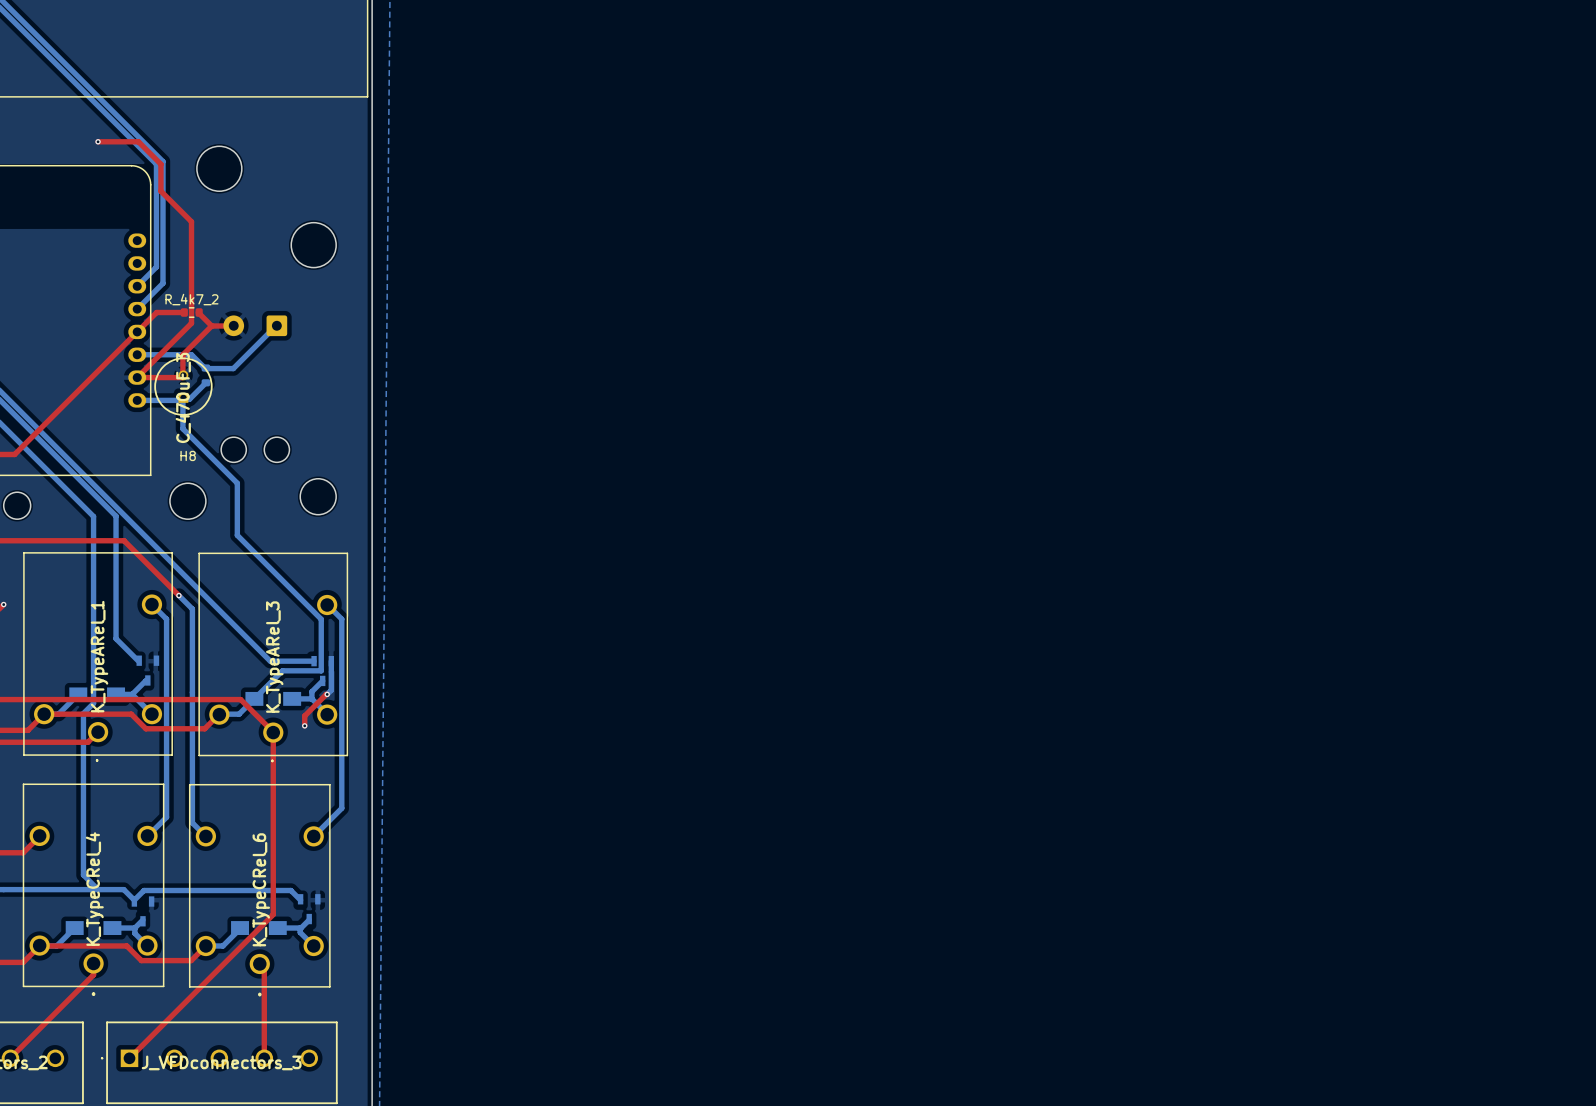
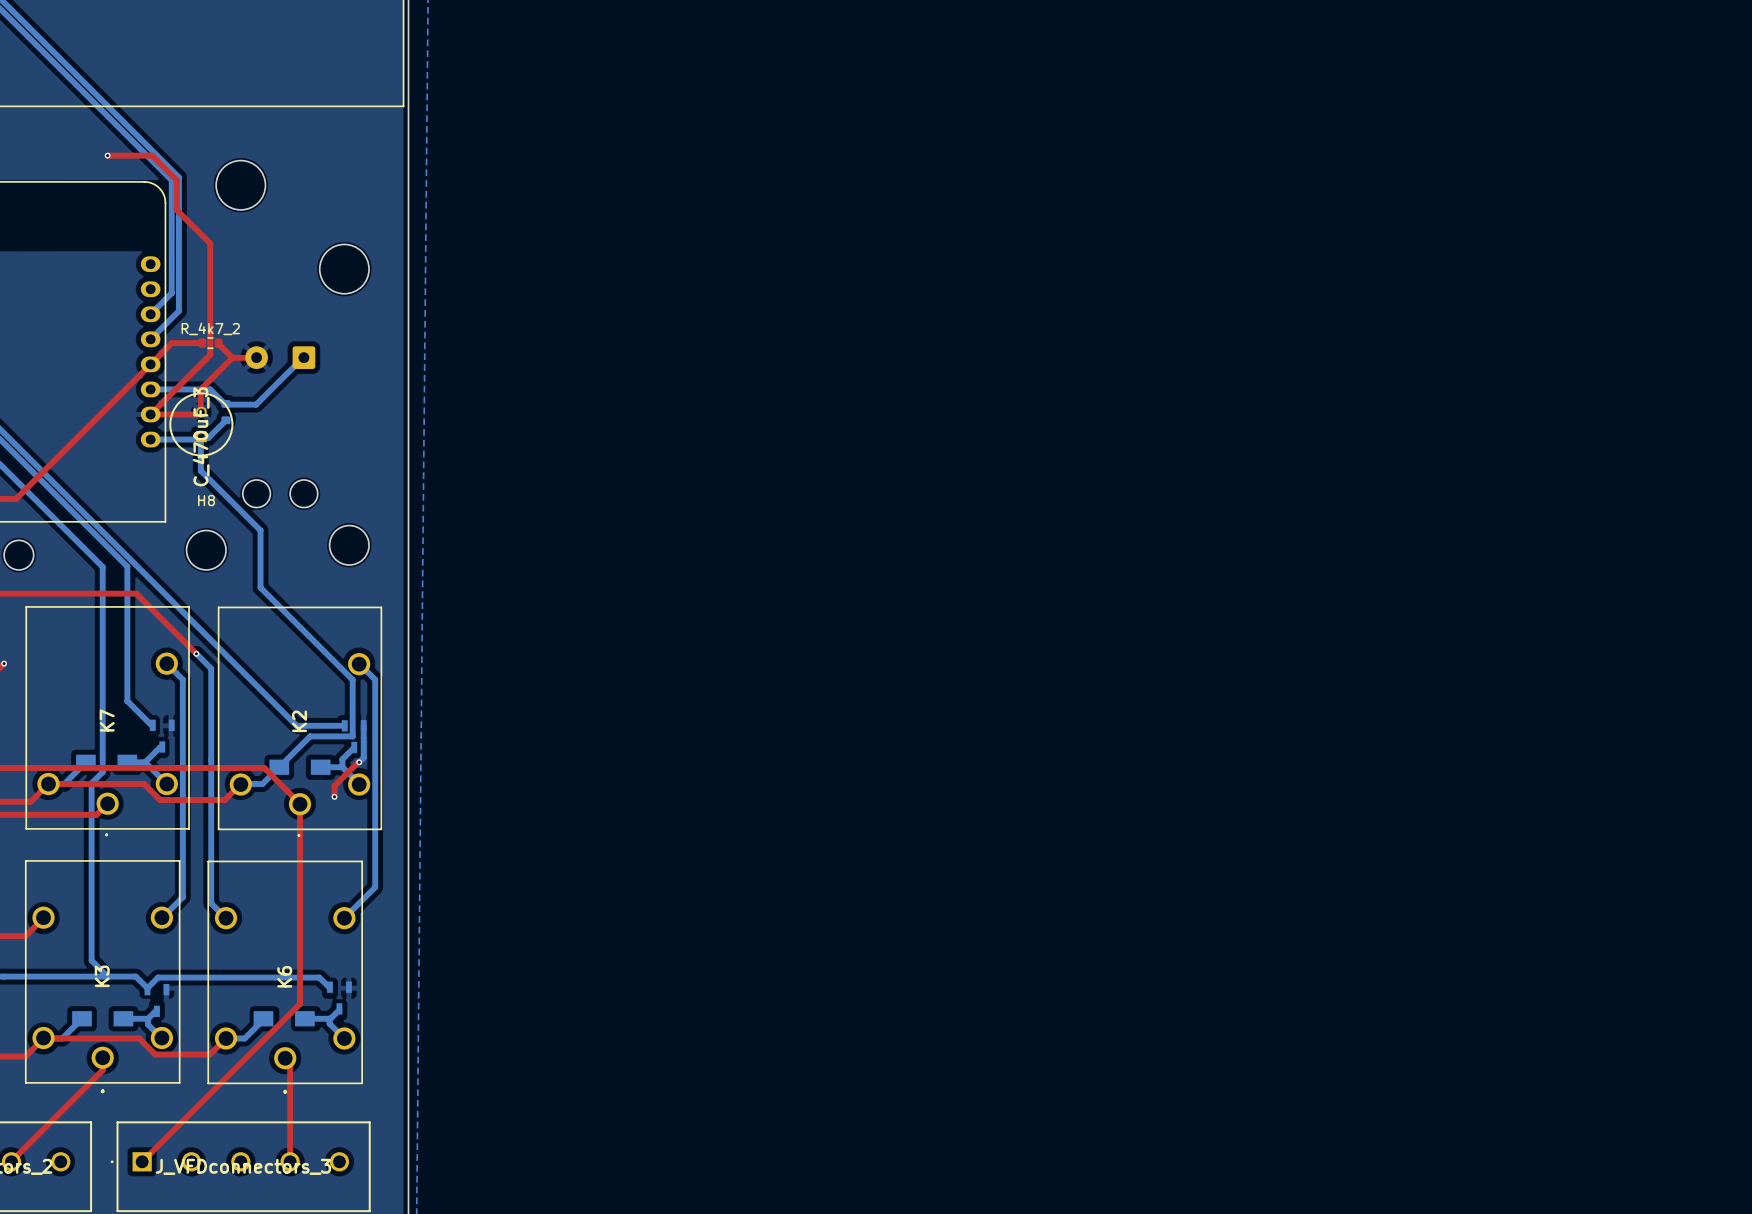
K_TypeARel_1 name: K_TypeARel_1 (99, 656) -> K7 (107, 720)
K_TypeARel_3 name: K_TypeARel_3 (274, 657) -> K2 (299, 721)
K_TypeCRel_4 name: K_TypeCRel_4 (94, 889) -> K3 (102, 976)
K_TypeCRel_6 name: K_TypeCRel_6 (261, 889) -> K6 (284, 976)

